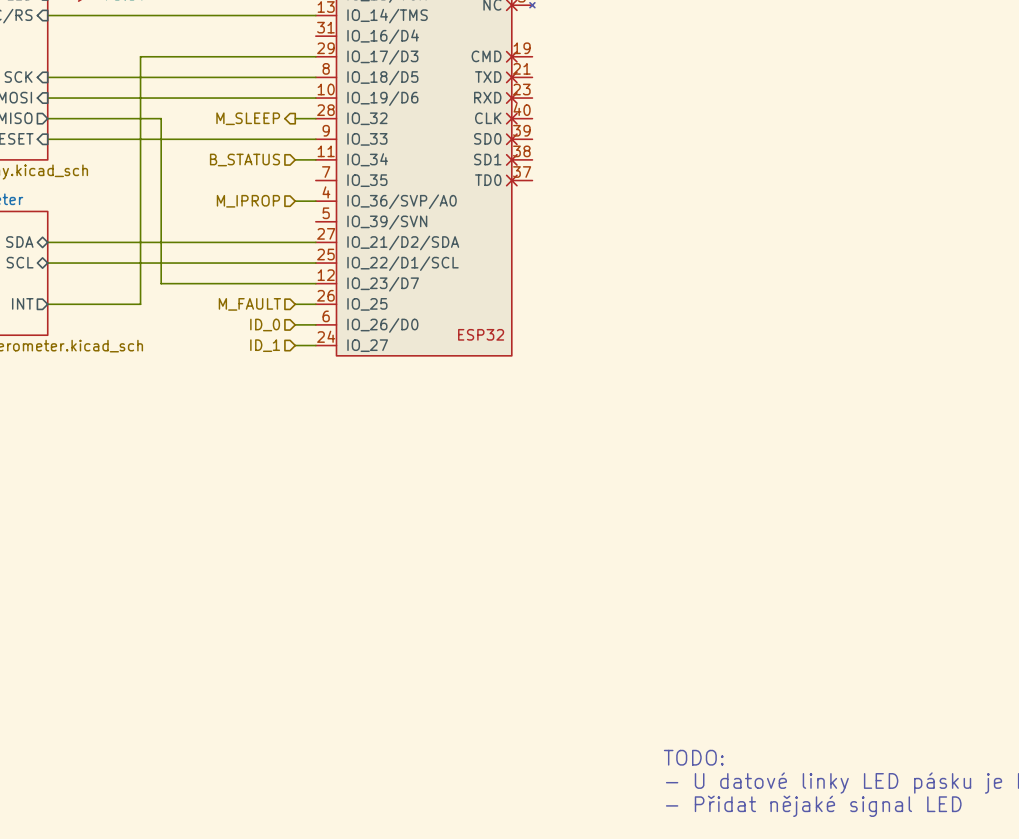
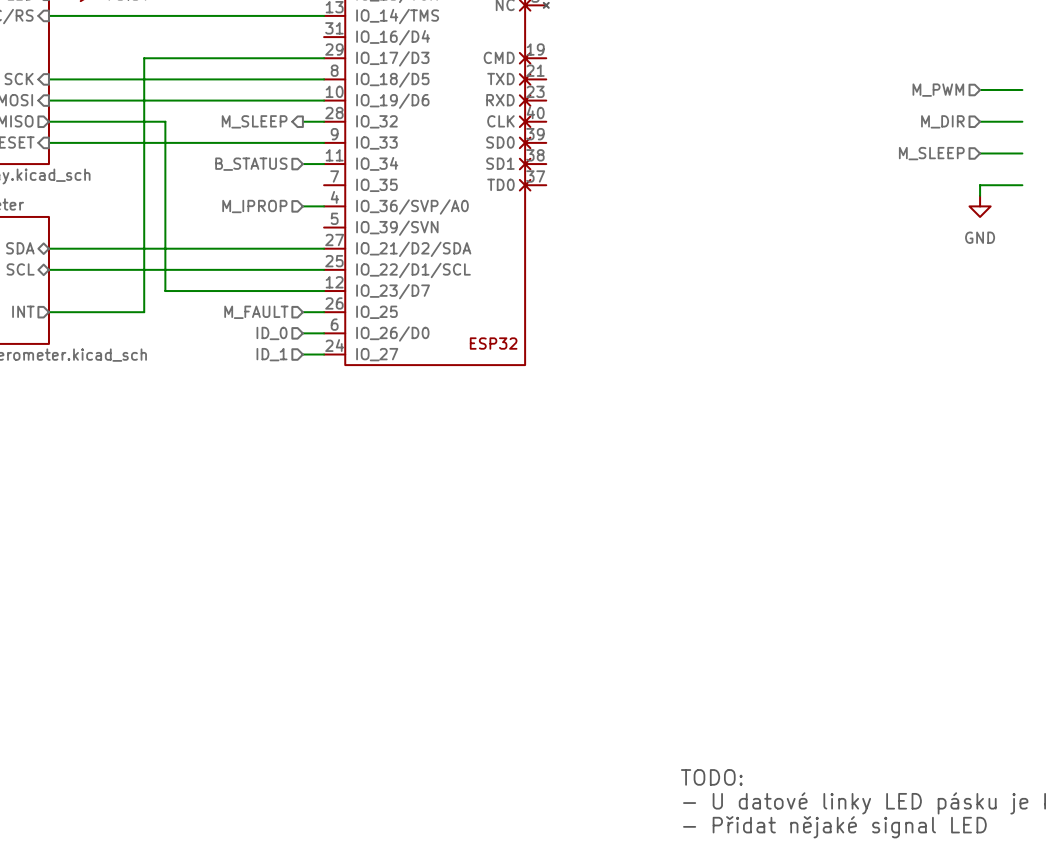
hierarchical label: none -> M_PWM (938, 90)
wire: none -> (980, 89) (1022, 89)
hierarchical label: none -> M_DIR (942, 121)
wire: none -> (980, 121) (1022, 121)
hierarchical label: none -> M_SLEEP (931, 153)
wire: none -> (980, 153) (1022, 153)
wire: none -> (1022, 185) (980, 185) (980, 195)
power symbol: none -> GND (980, 206)

